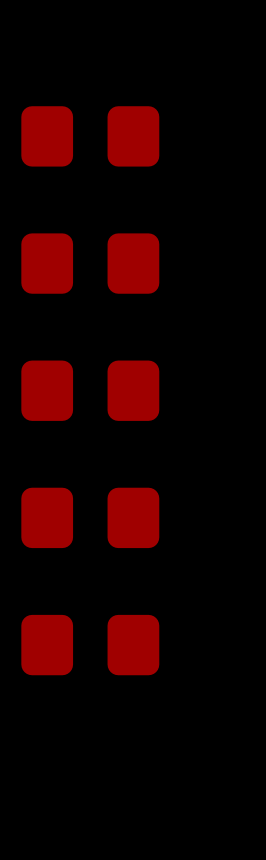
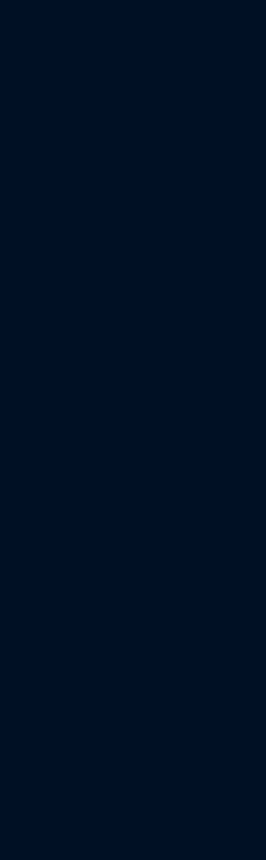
part: (90, 136) -> none
part: (90, 263) -> none
part: (90, 390) -> none
part: (90, 517) -> none
part: (90, 645) -> none

